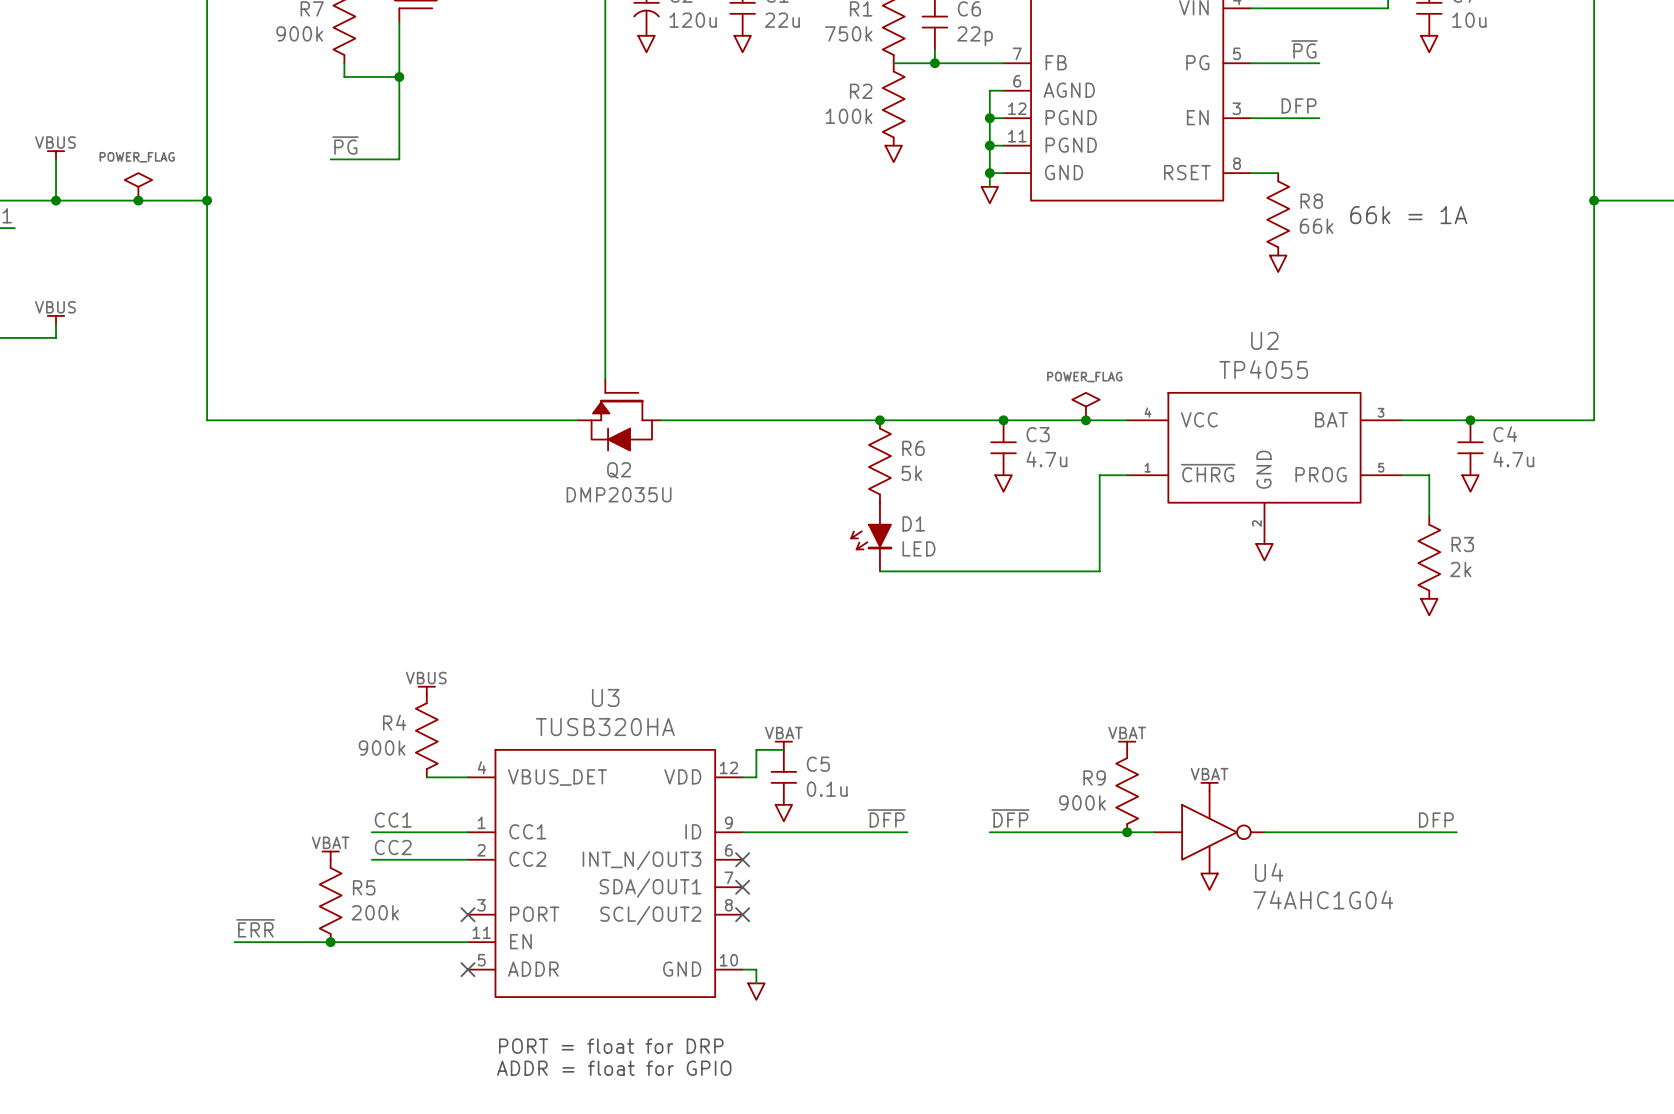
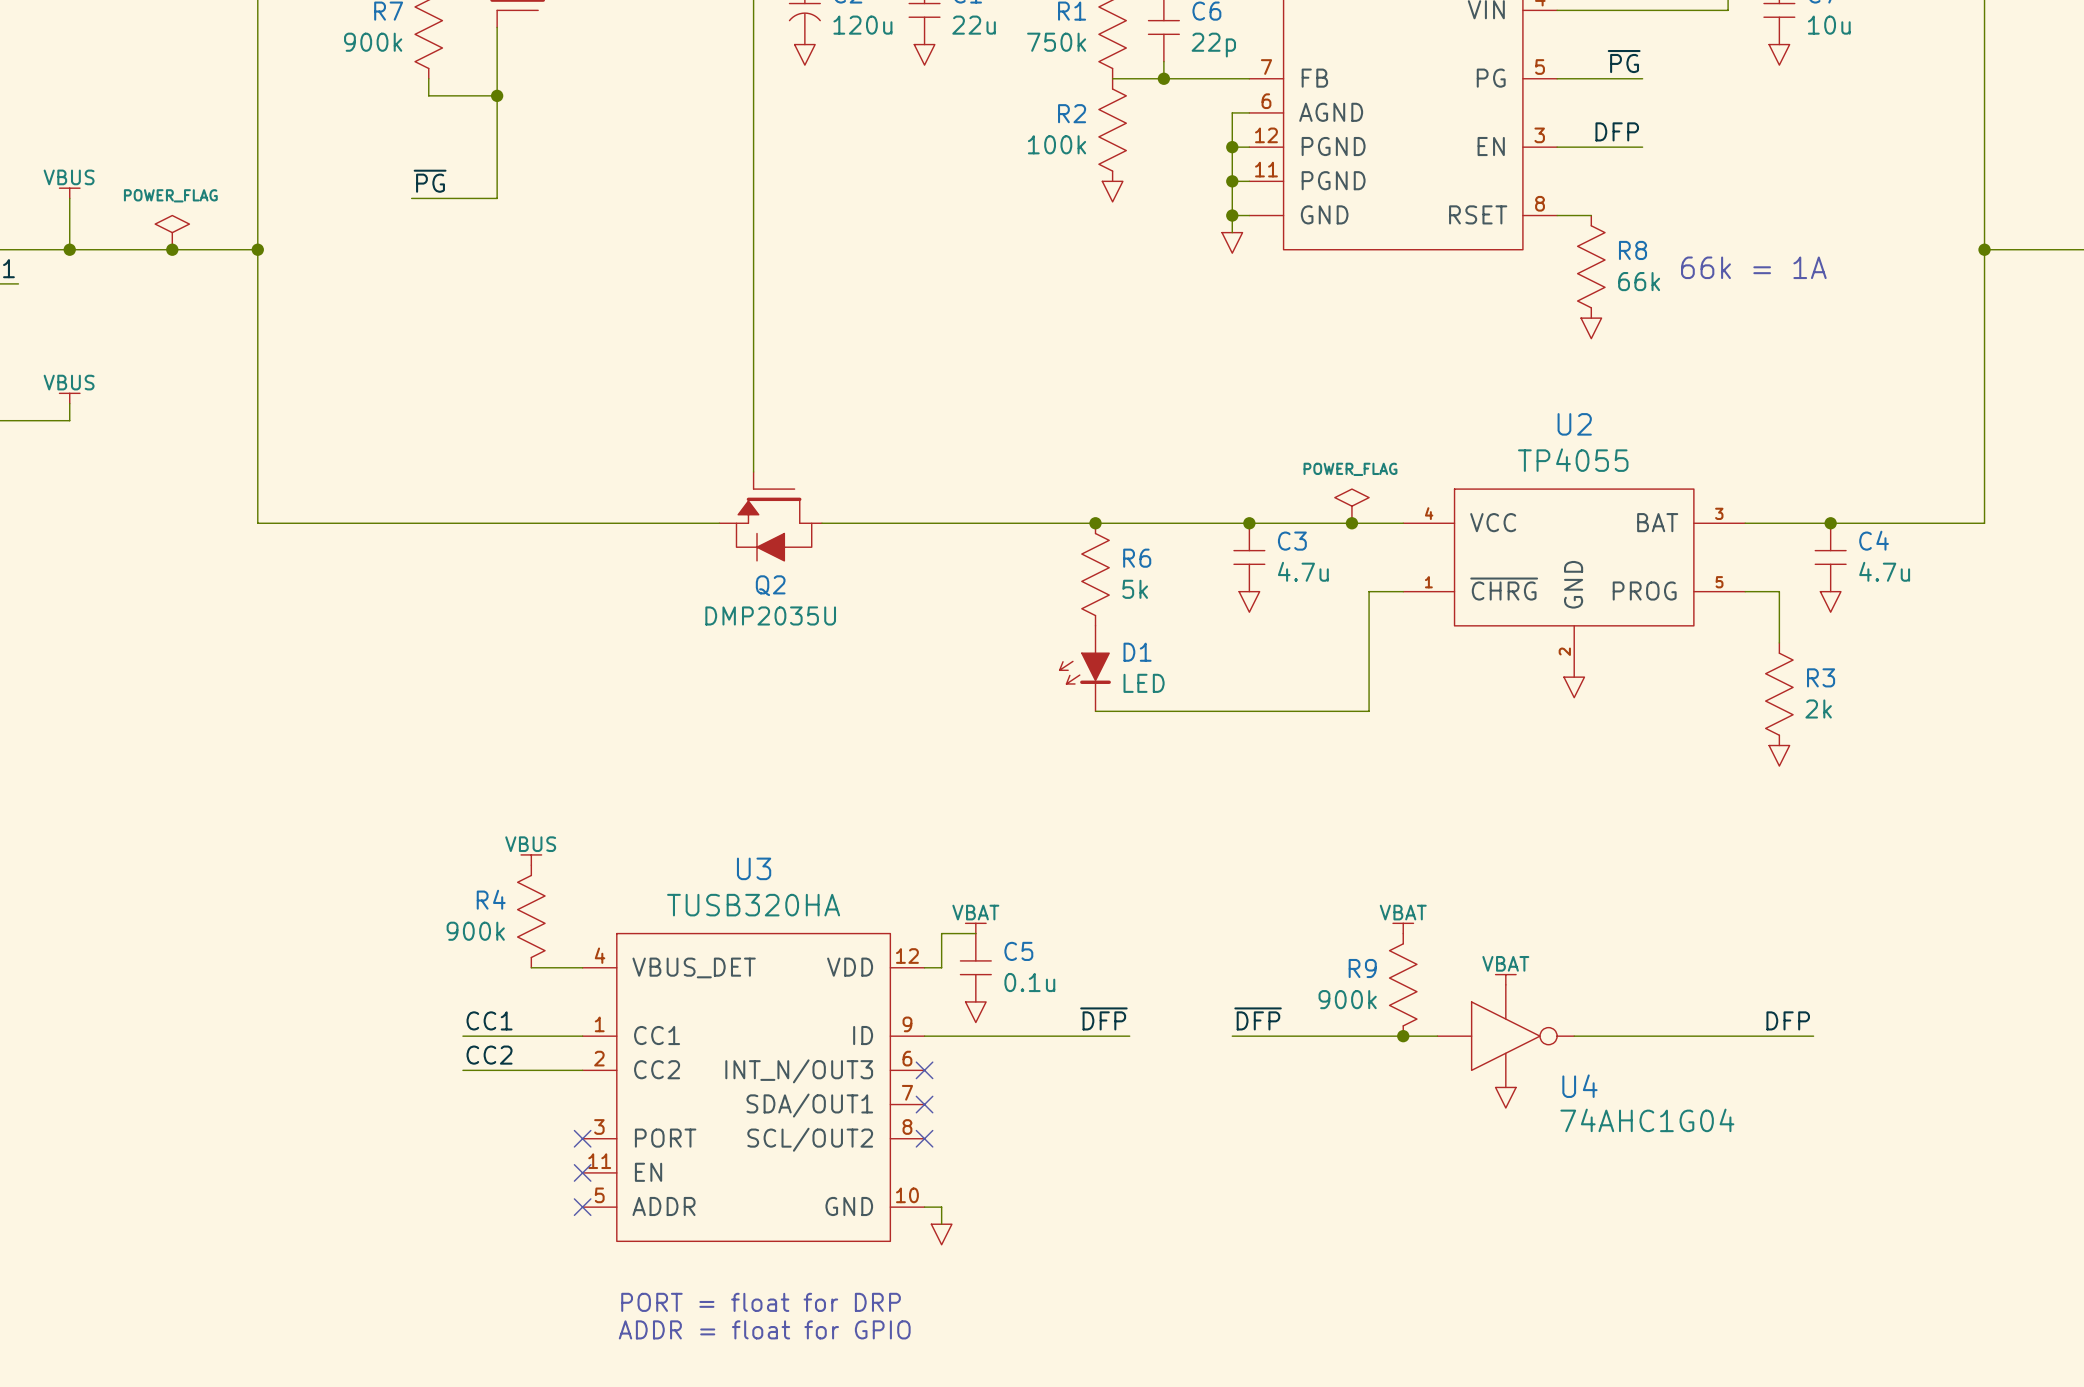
power symbol: VBAT (330, 855) -> none
R5: 200k (330, 900) -> none
label: ~{ERR} (255, 928) -> none
wire: (234, 942) (467, 942) -> none
junction: (330, 942) -> none
no-connect mark: none -> (582, 1172)

